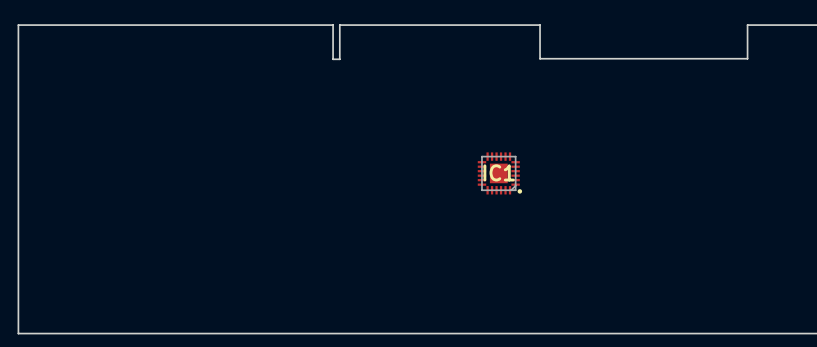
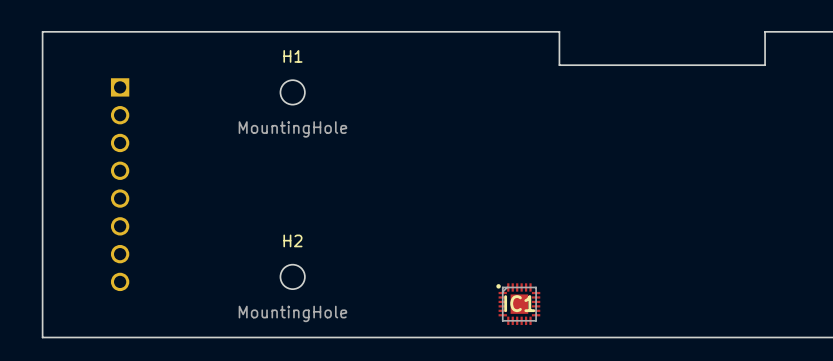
board edge: (333, 25) (333, 59) (339, 59) (339, 25) -> (354, 31) (361, 31)
H1: none -> MountingHole (292, 92)
IC1 rotation: 0° (499, 173) -> 180° (518, 304)
IC1 position: (499, 173) -> (518, 304)
part: none -> (120, 184)
H2: none -> MountingHole (292, 276)

